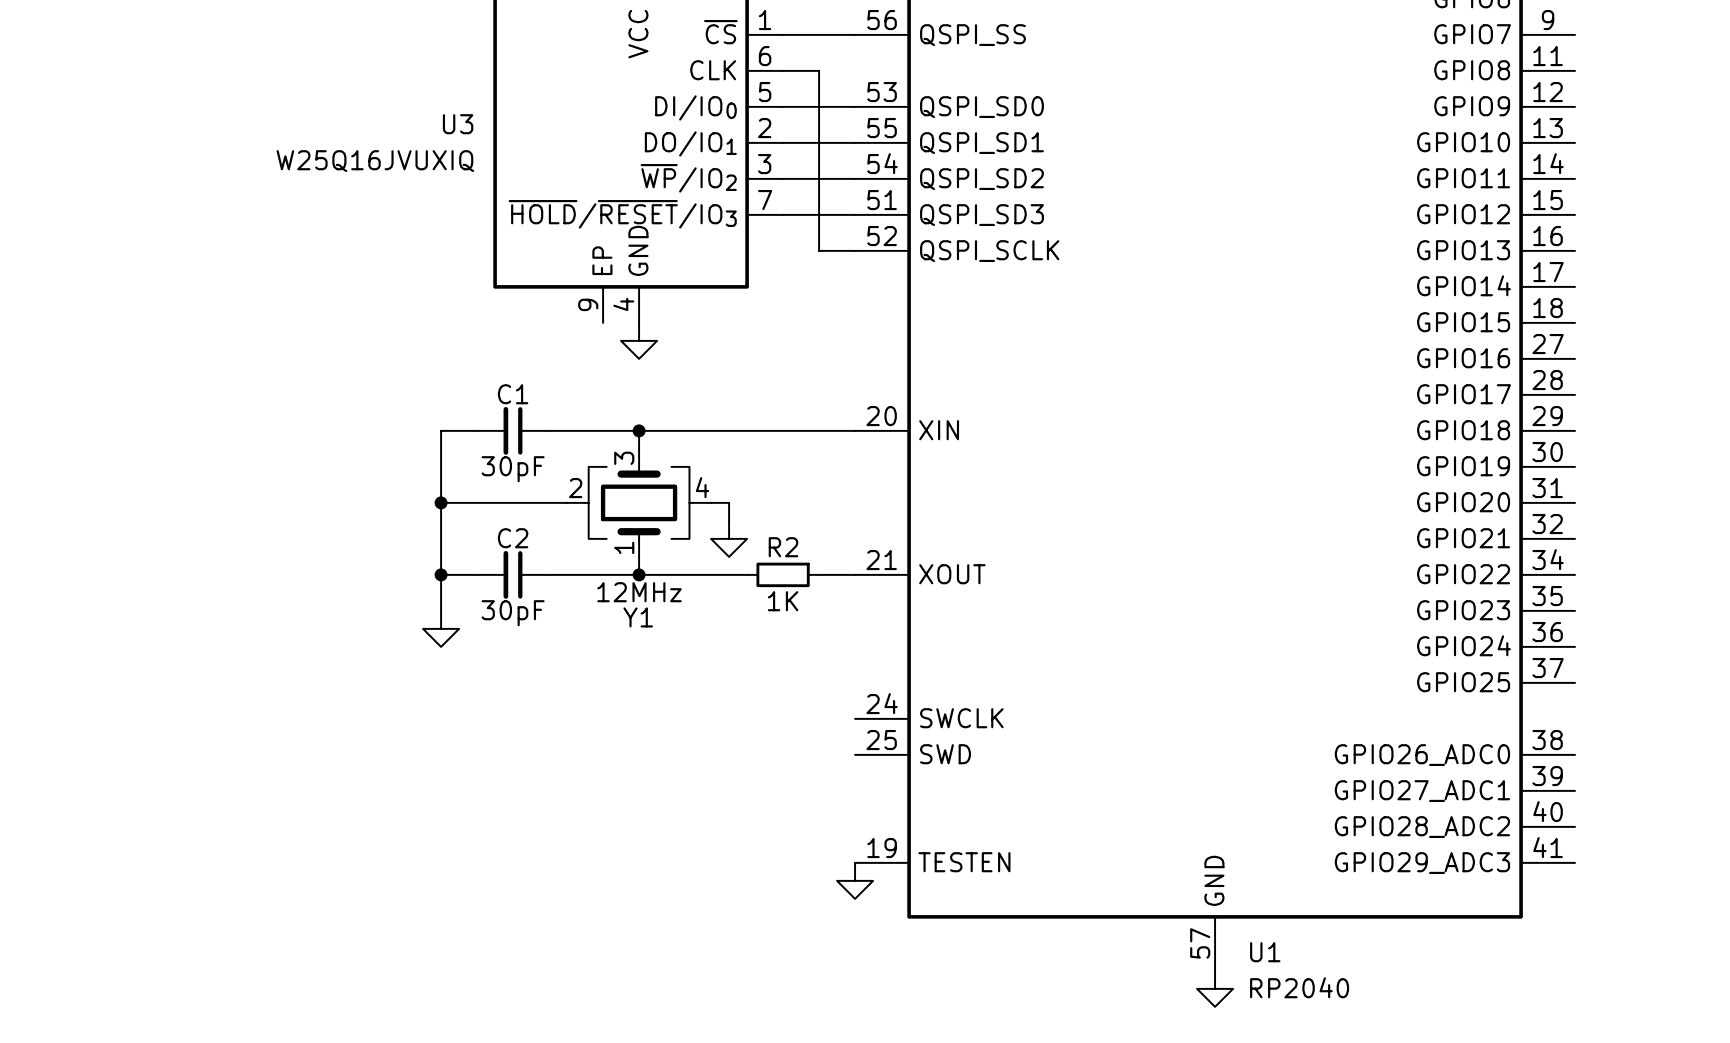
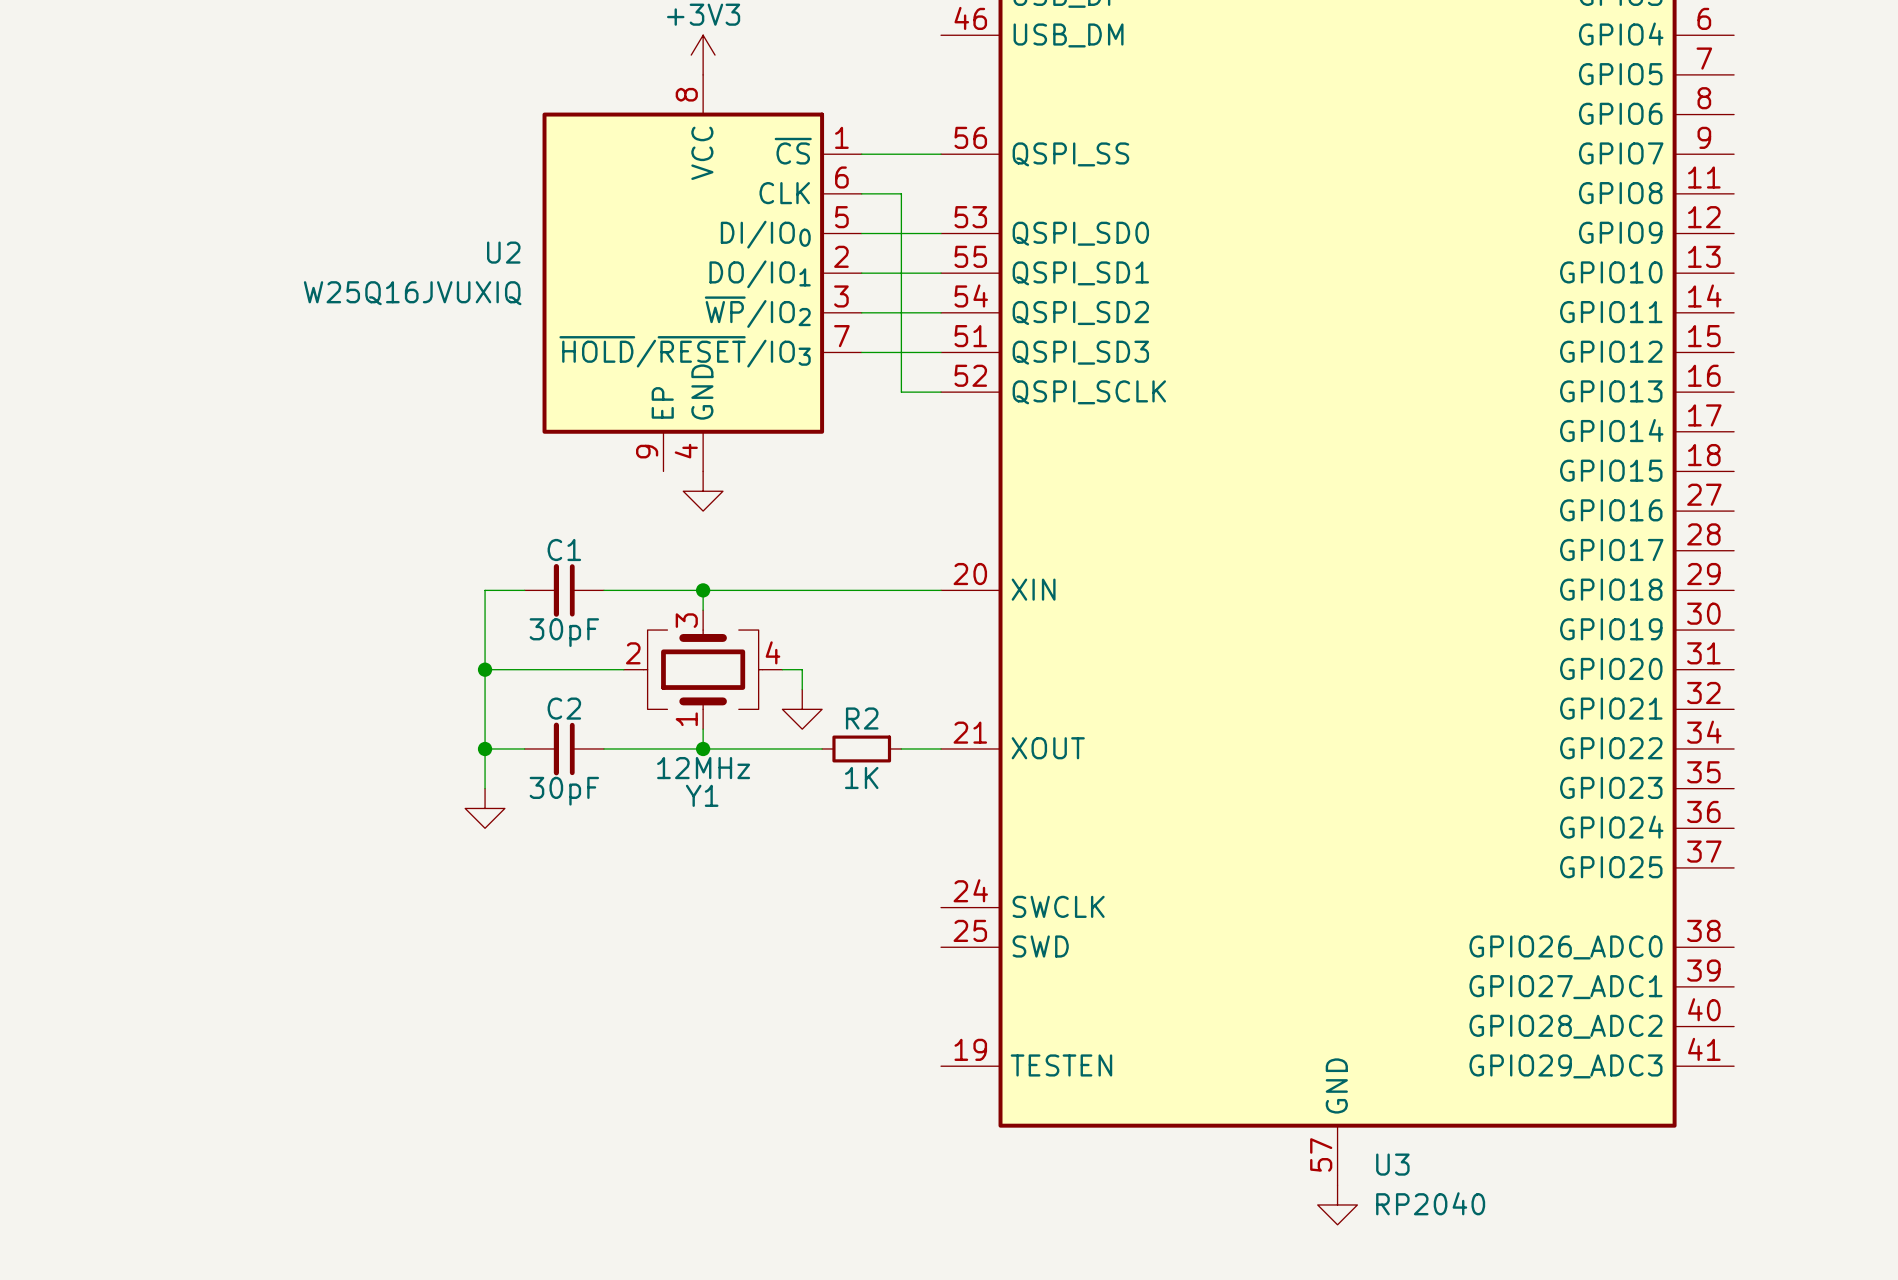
U3 name: U3 (458, 124) -> U2 (503, 252)
power symbol: (855, 880) -> none
U1 name: U1 (1265, 952) -> U3 (1392, 1164)

